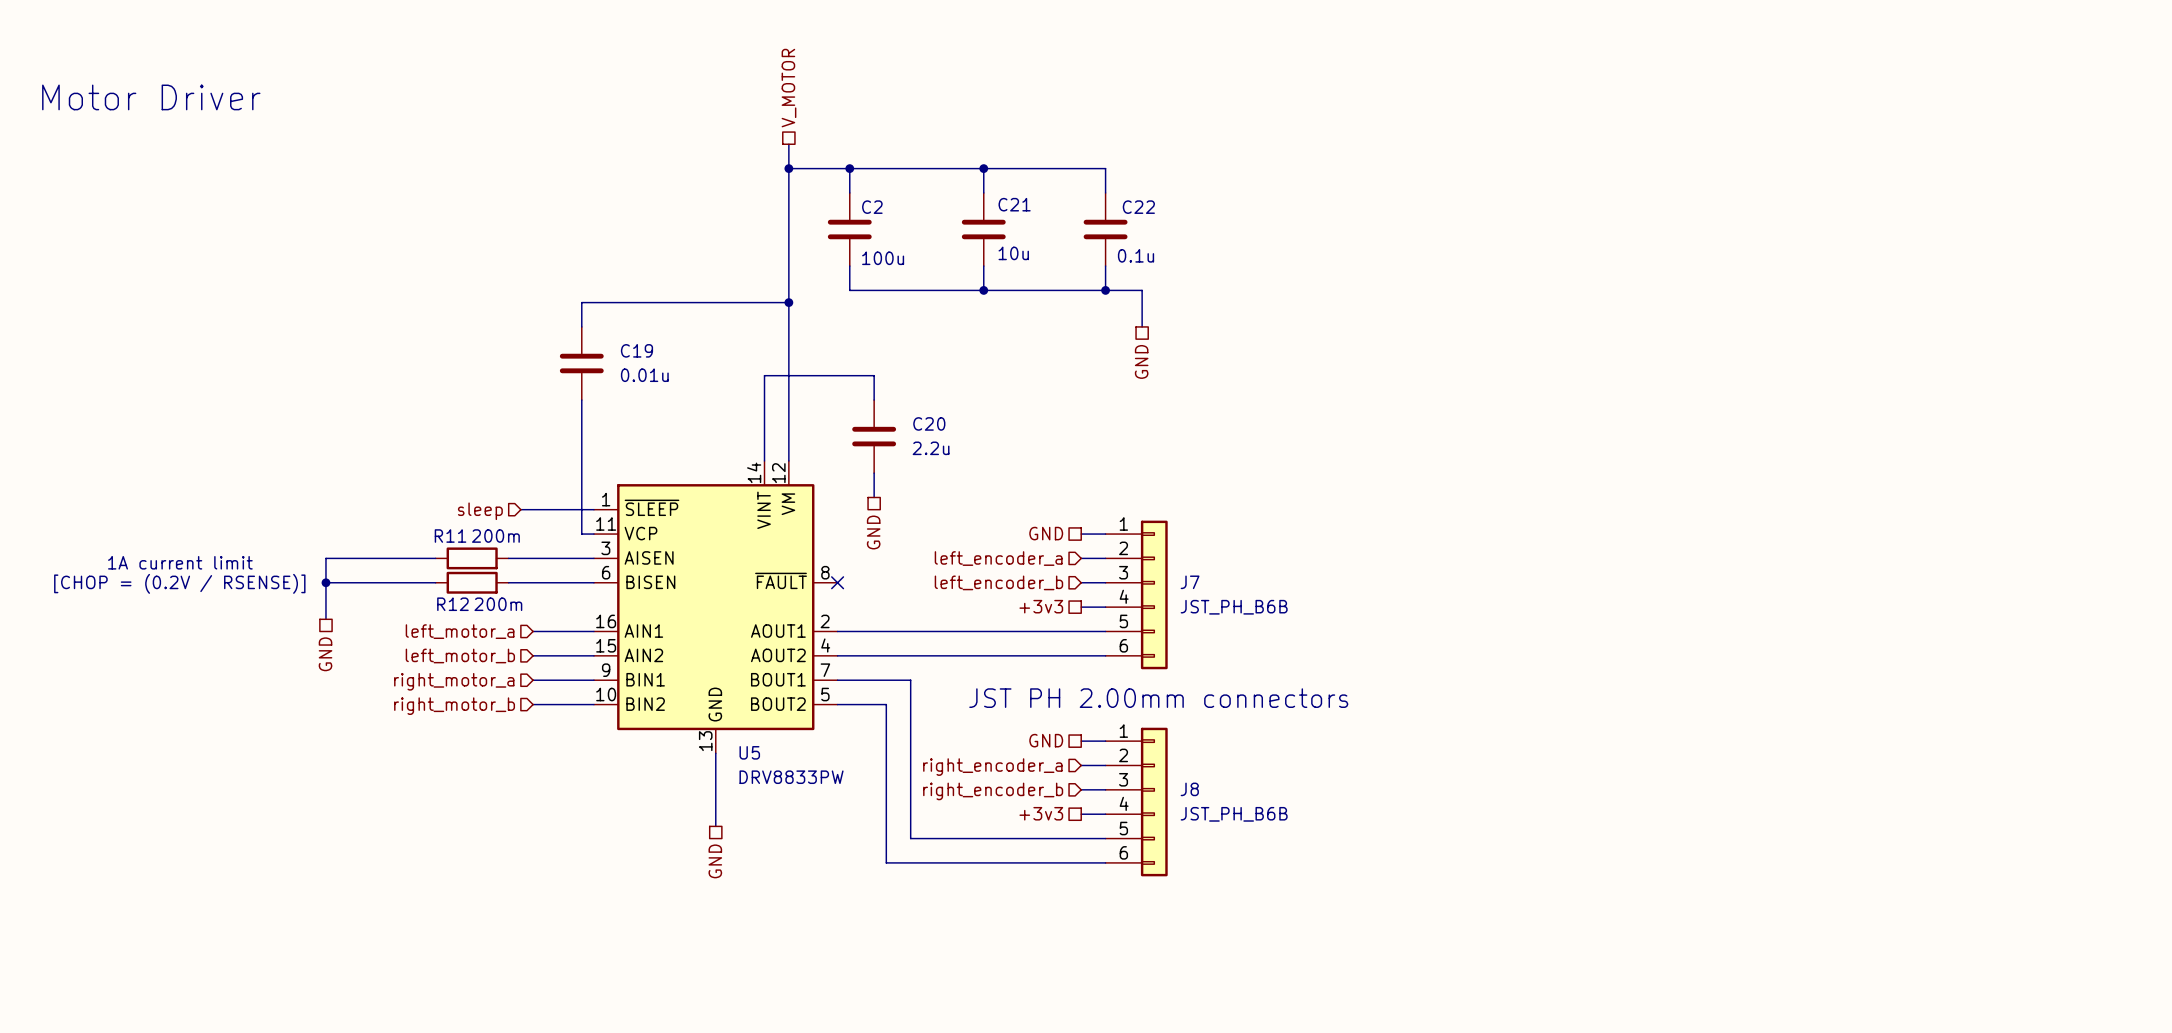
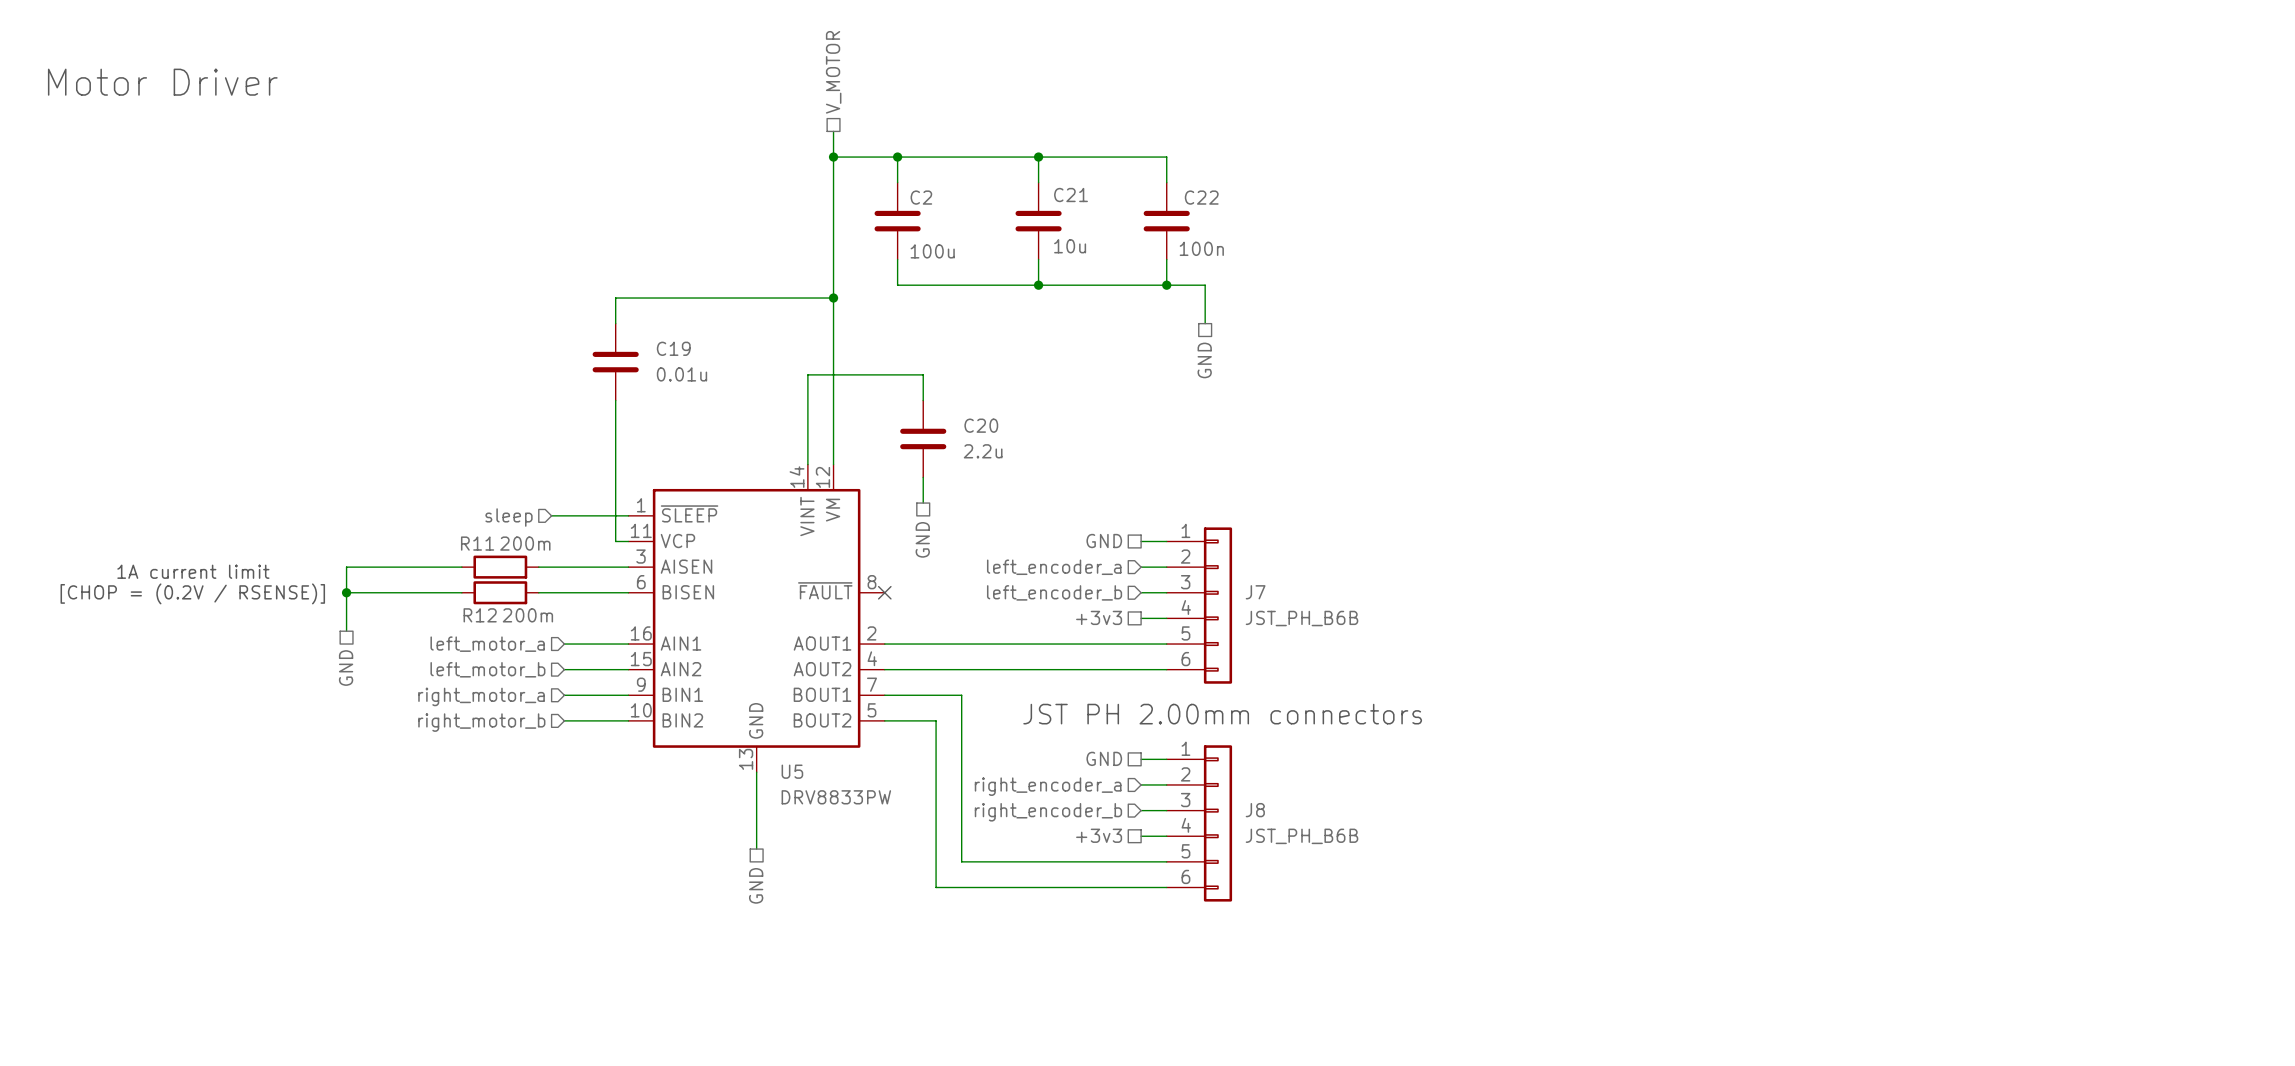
C22 value: 0.1u (1136, 255) -> 100n (1201, 248)

